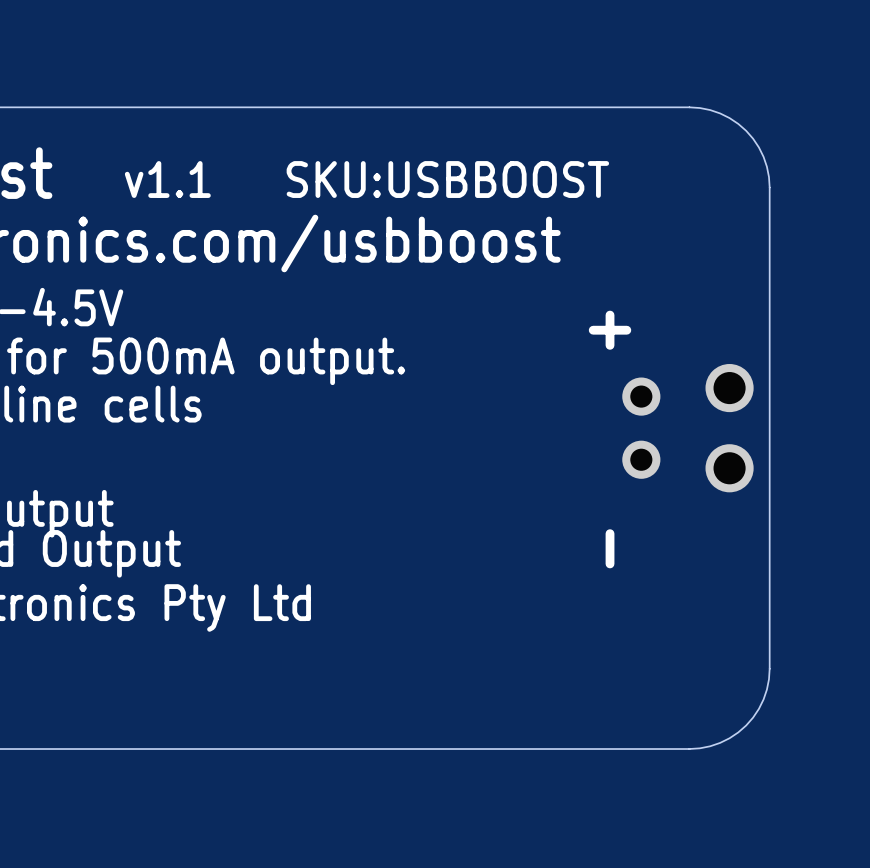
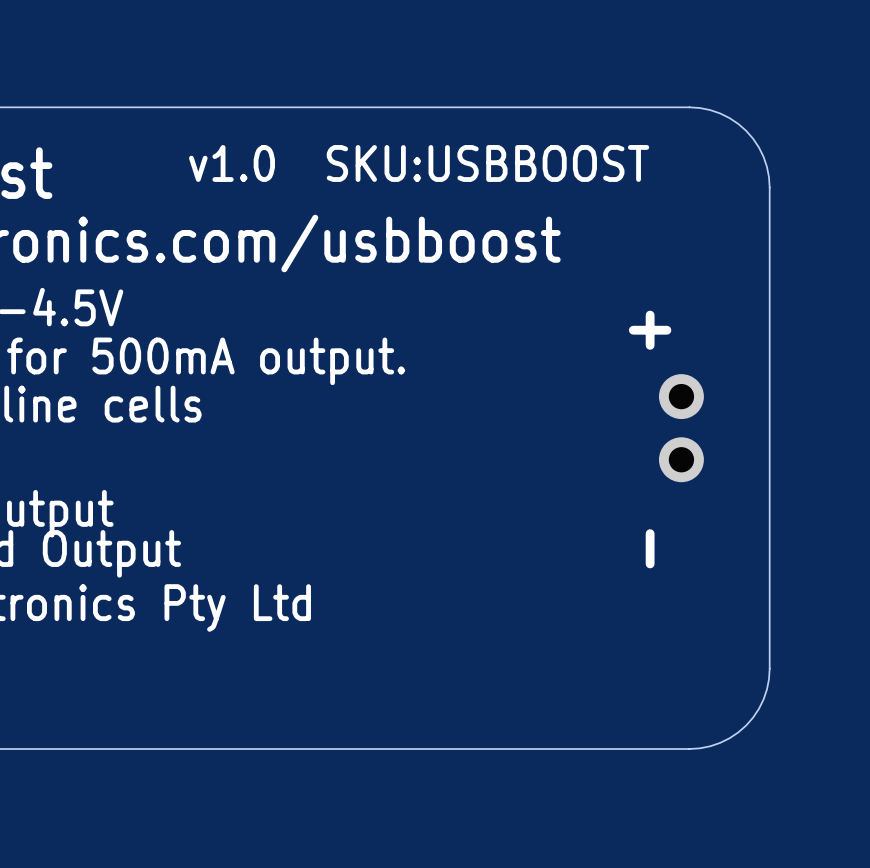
text: v1.1 (167, 179) -> v1.0 (231, 163)
text position: SKU:USBBOOST (447, 179) -> SKU:USBBOOST (487, 163)
text position: + (610, 330) -> + (650, 330)
part: (641, 428) -> none
part: none -> (681, 428)
part: (729, 428) -> none
text position: - (610, 548) -> - (650, 548)

